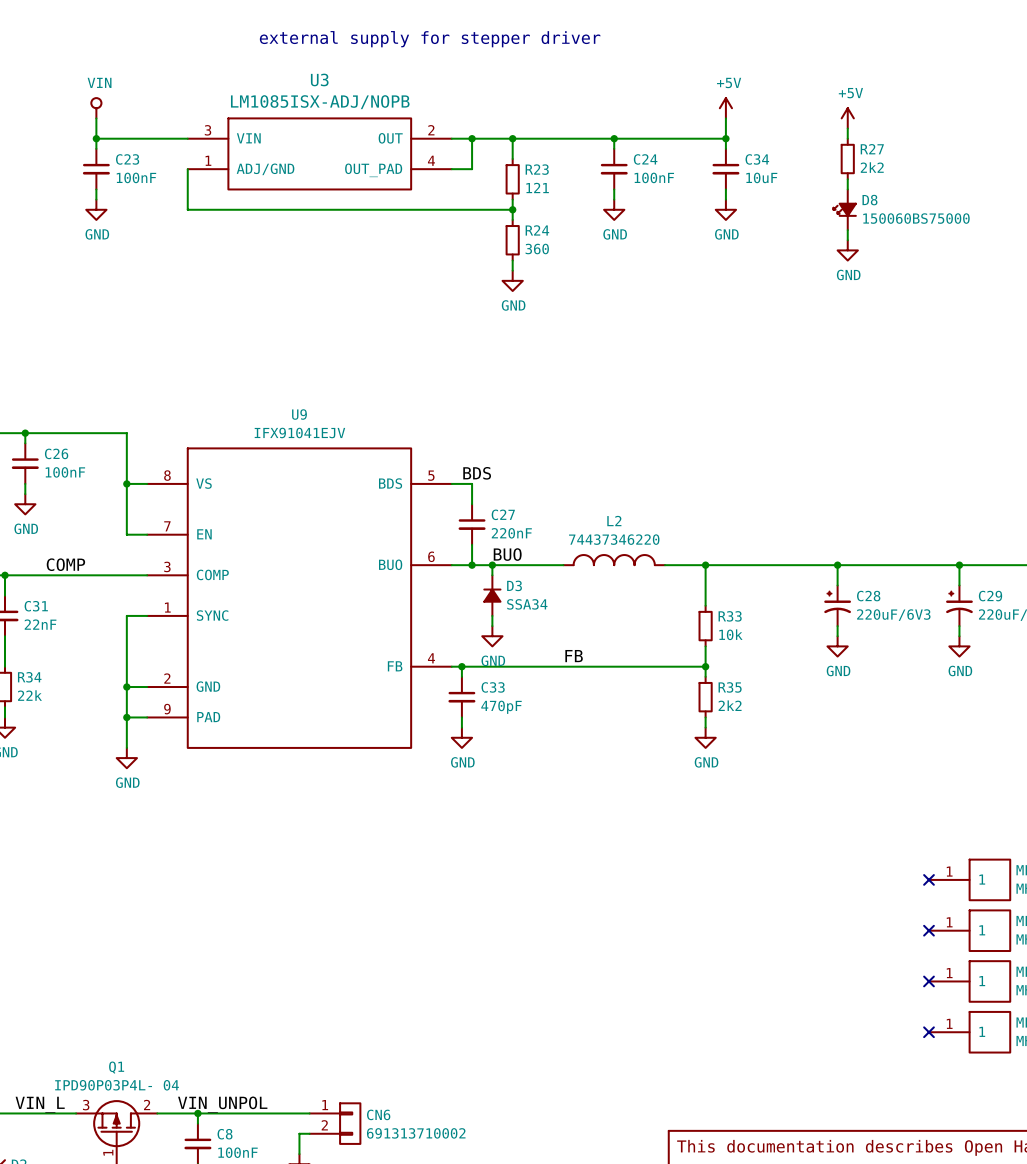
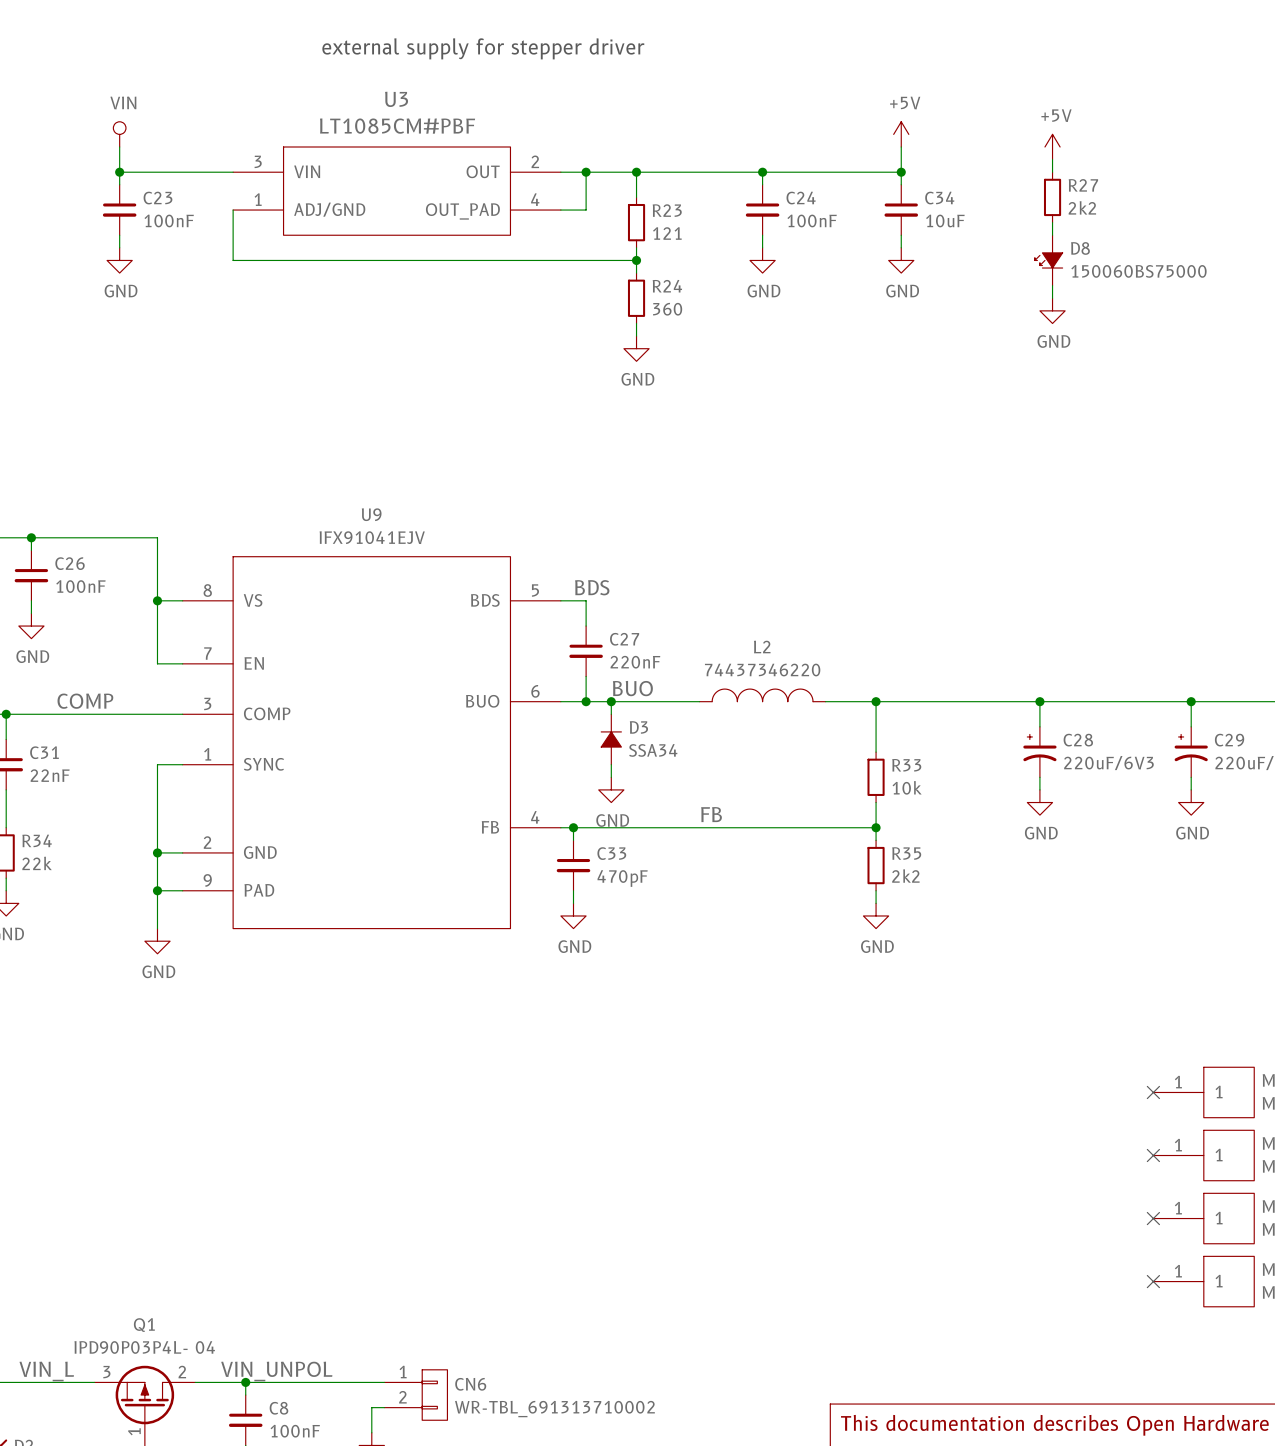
U3 value: LM1085ISX-ADJ/NOPB (320, 102) -> LT1085CM#PBF (397, 126)
CN6 value: 691313710002 (416, 1133) -> WR-TBL_691313710002 (554, 1409)

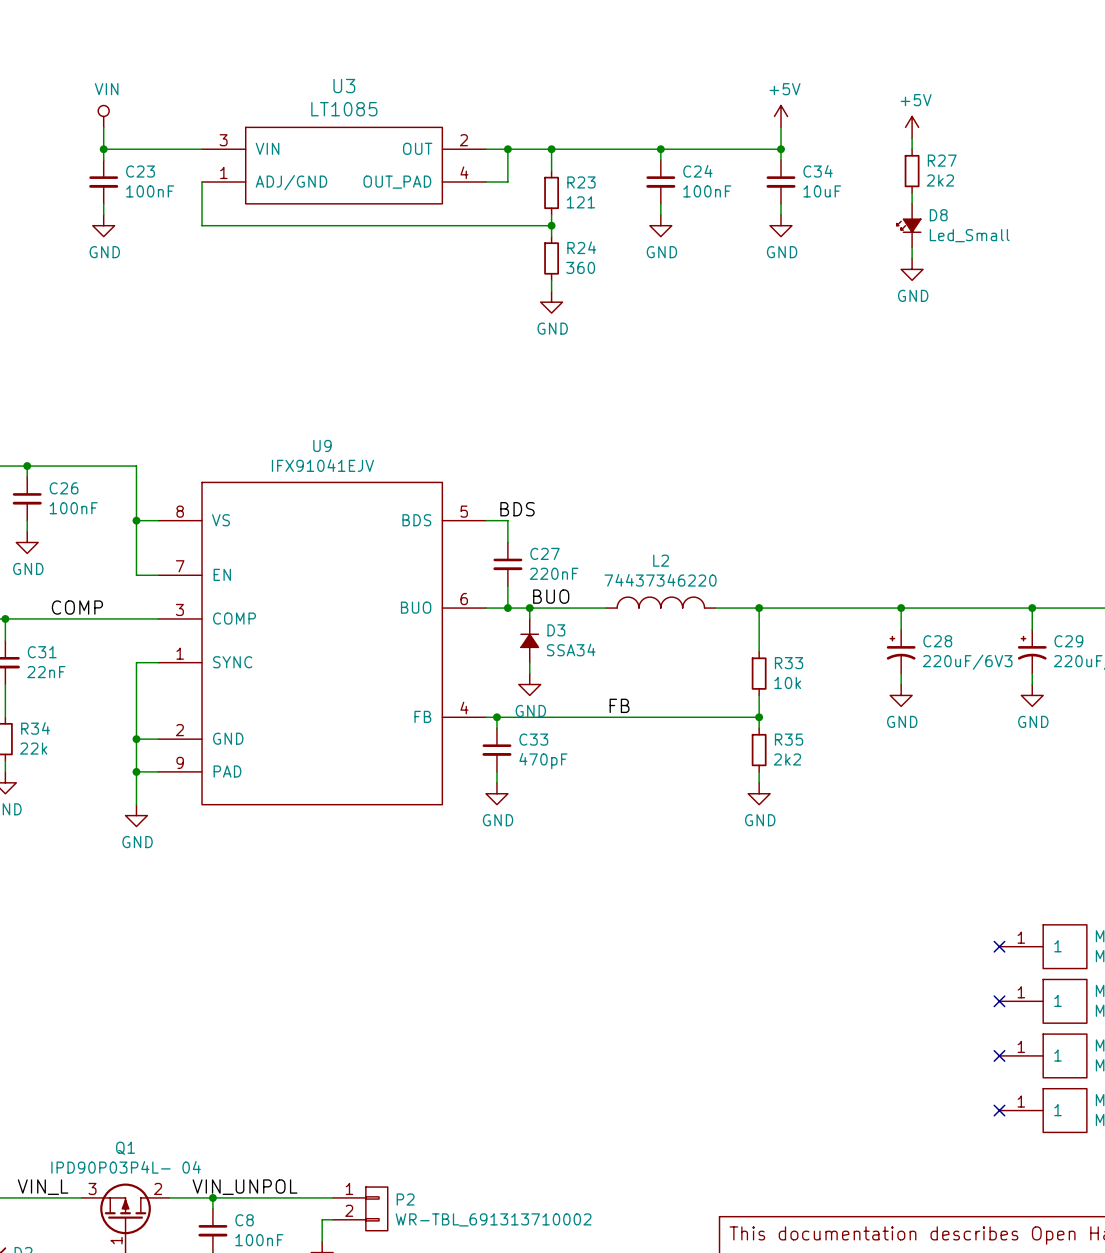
text: external supply for stepper driver (483, 48) -> none
U3 value: LT1085CM#PBF (397, 126) -> LT1085 (344, 109)
D8 value: 150060BS75000 (1138, 271) -> Led_Small (969, 235)
CN6 name: CN6 (470, 1384) -> P2 (405, 1199)

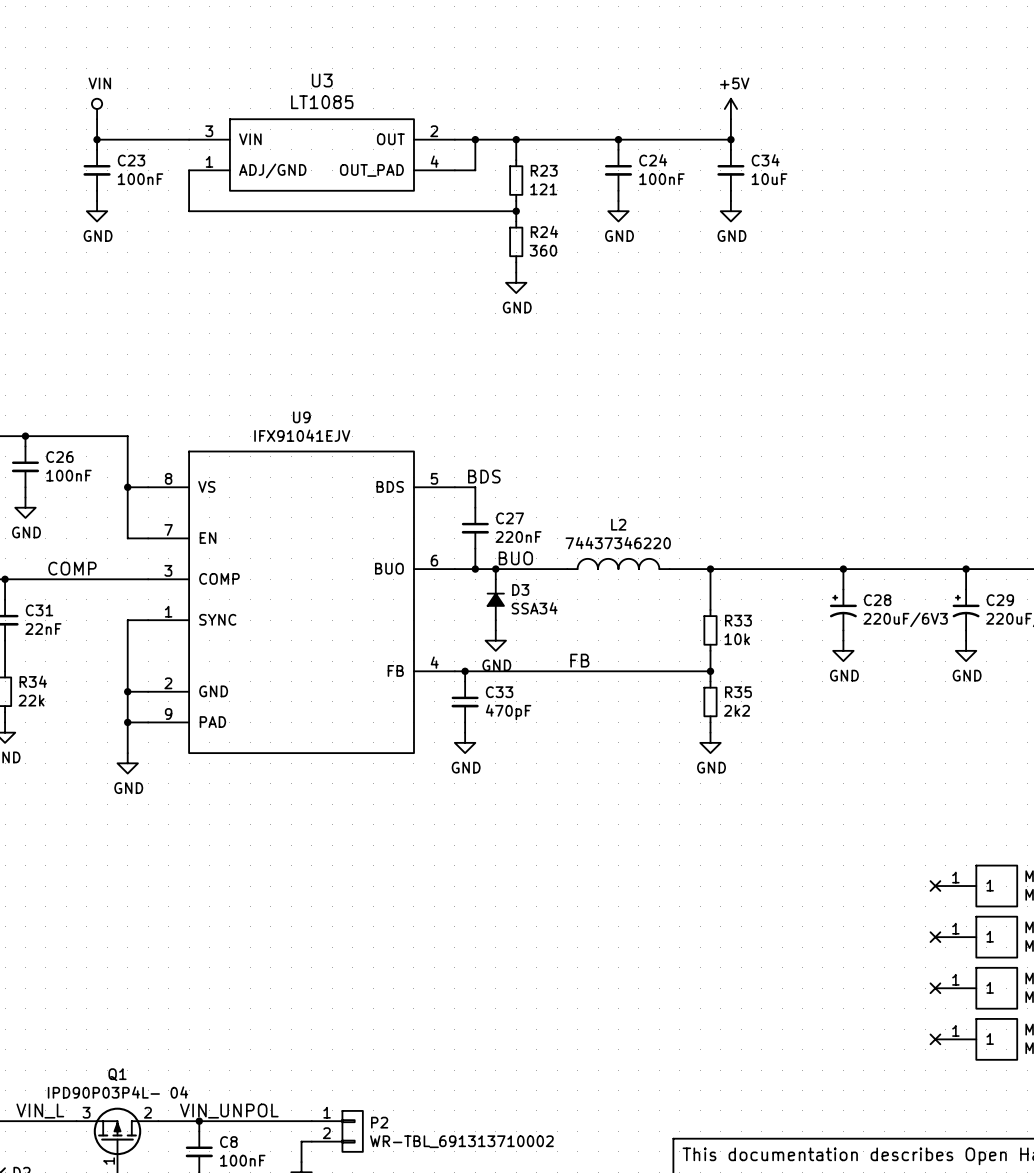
power symbol: +5V (912, 127) -> none
wire: (912, 138) (912, 149) -> none
R27: 2k2 (912, 171) -> none
wire: (912, 192) (912, 203) -> none
D8: Led_Small (908, 225) -> none
wire: (912, 247) (912, 258) -> none
power symbol: GND (912, 269) -> none

